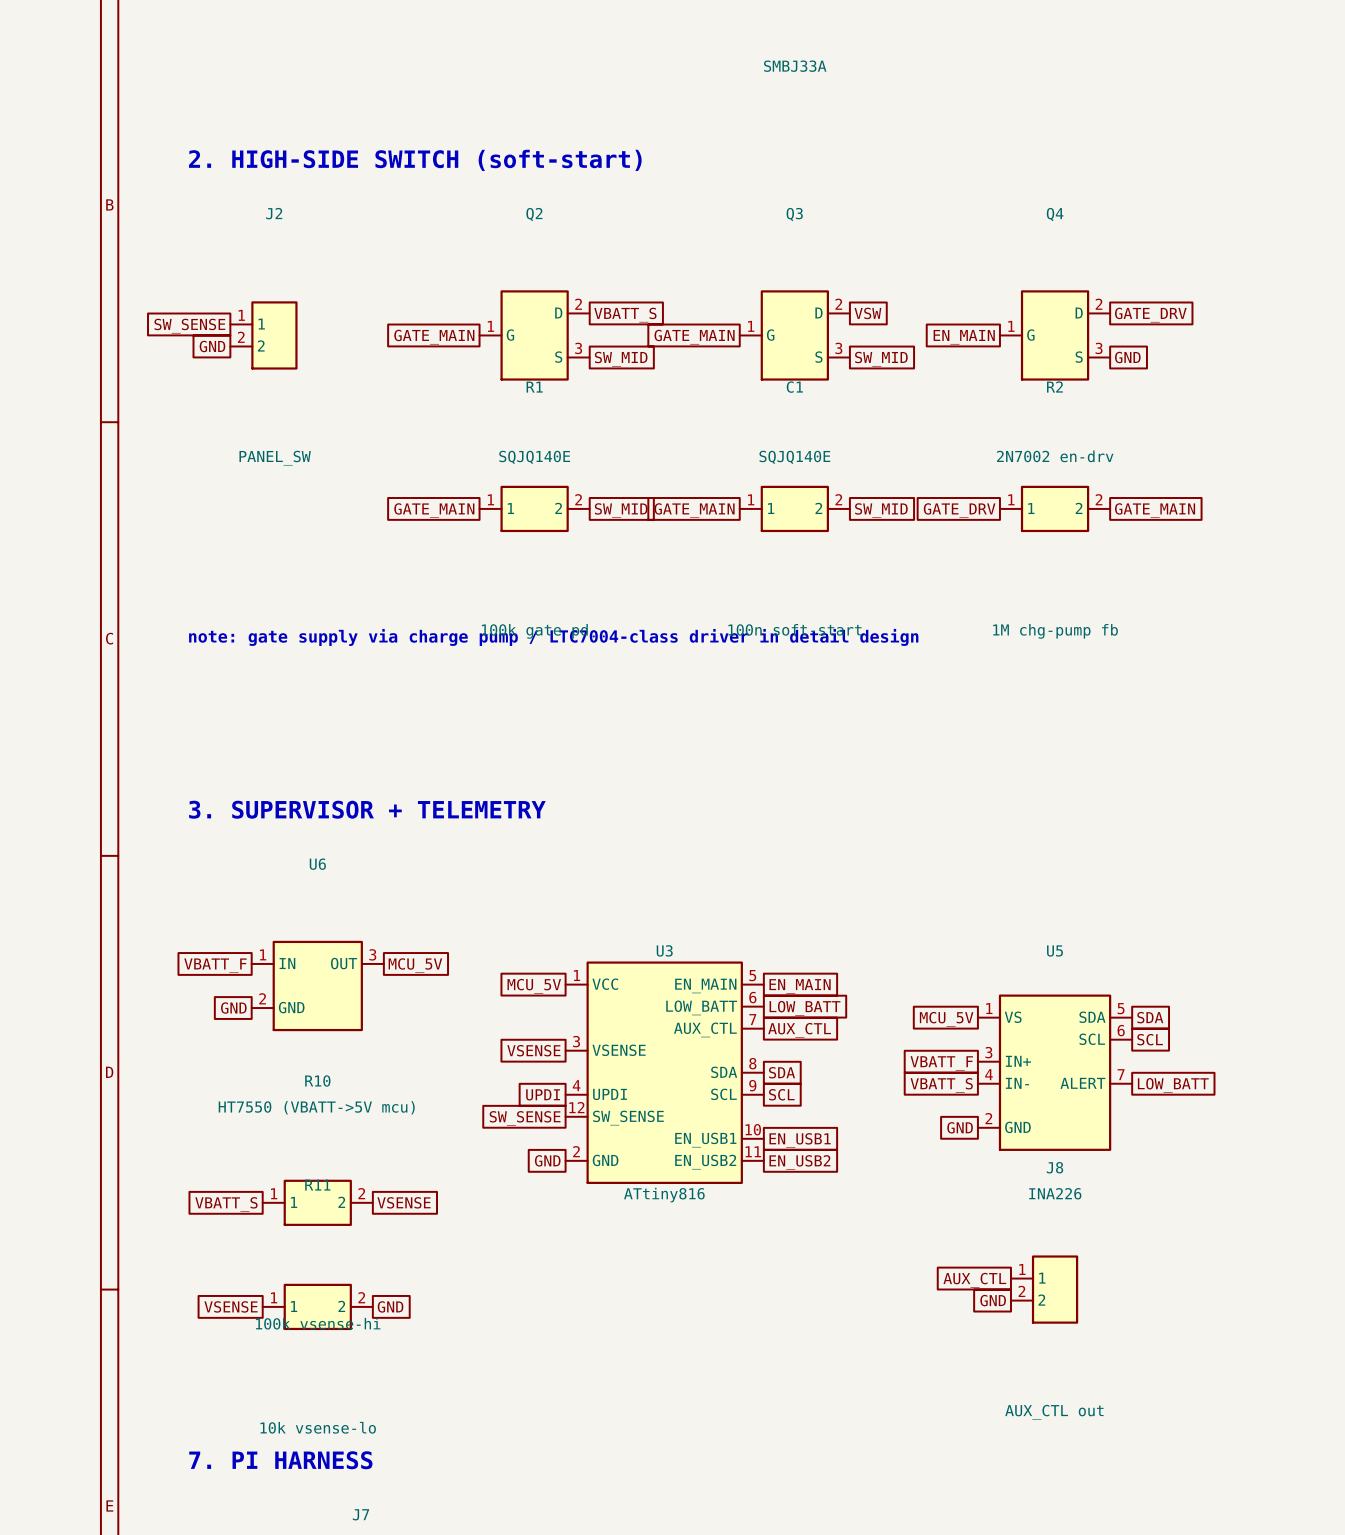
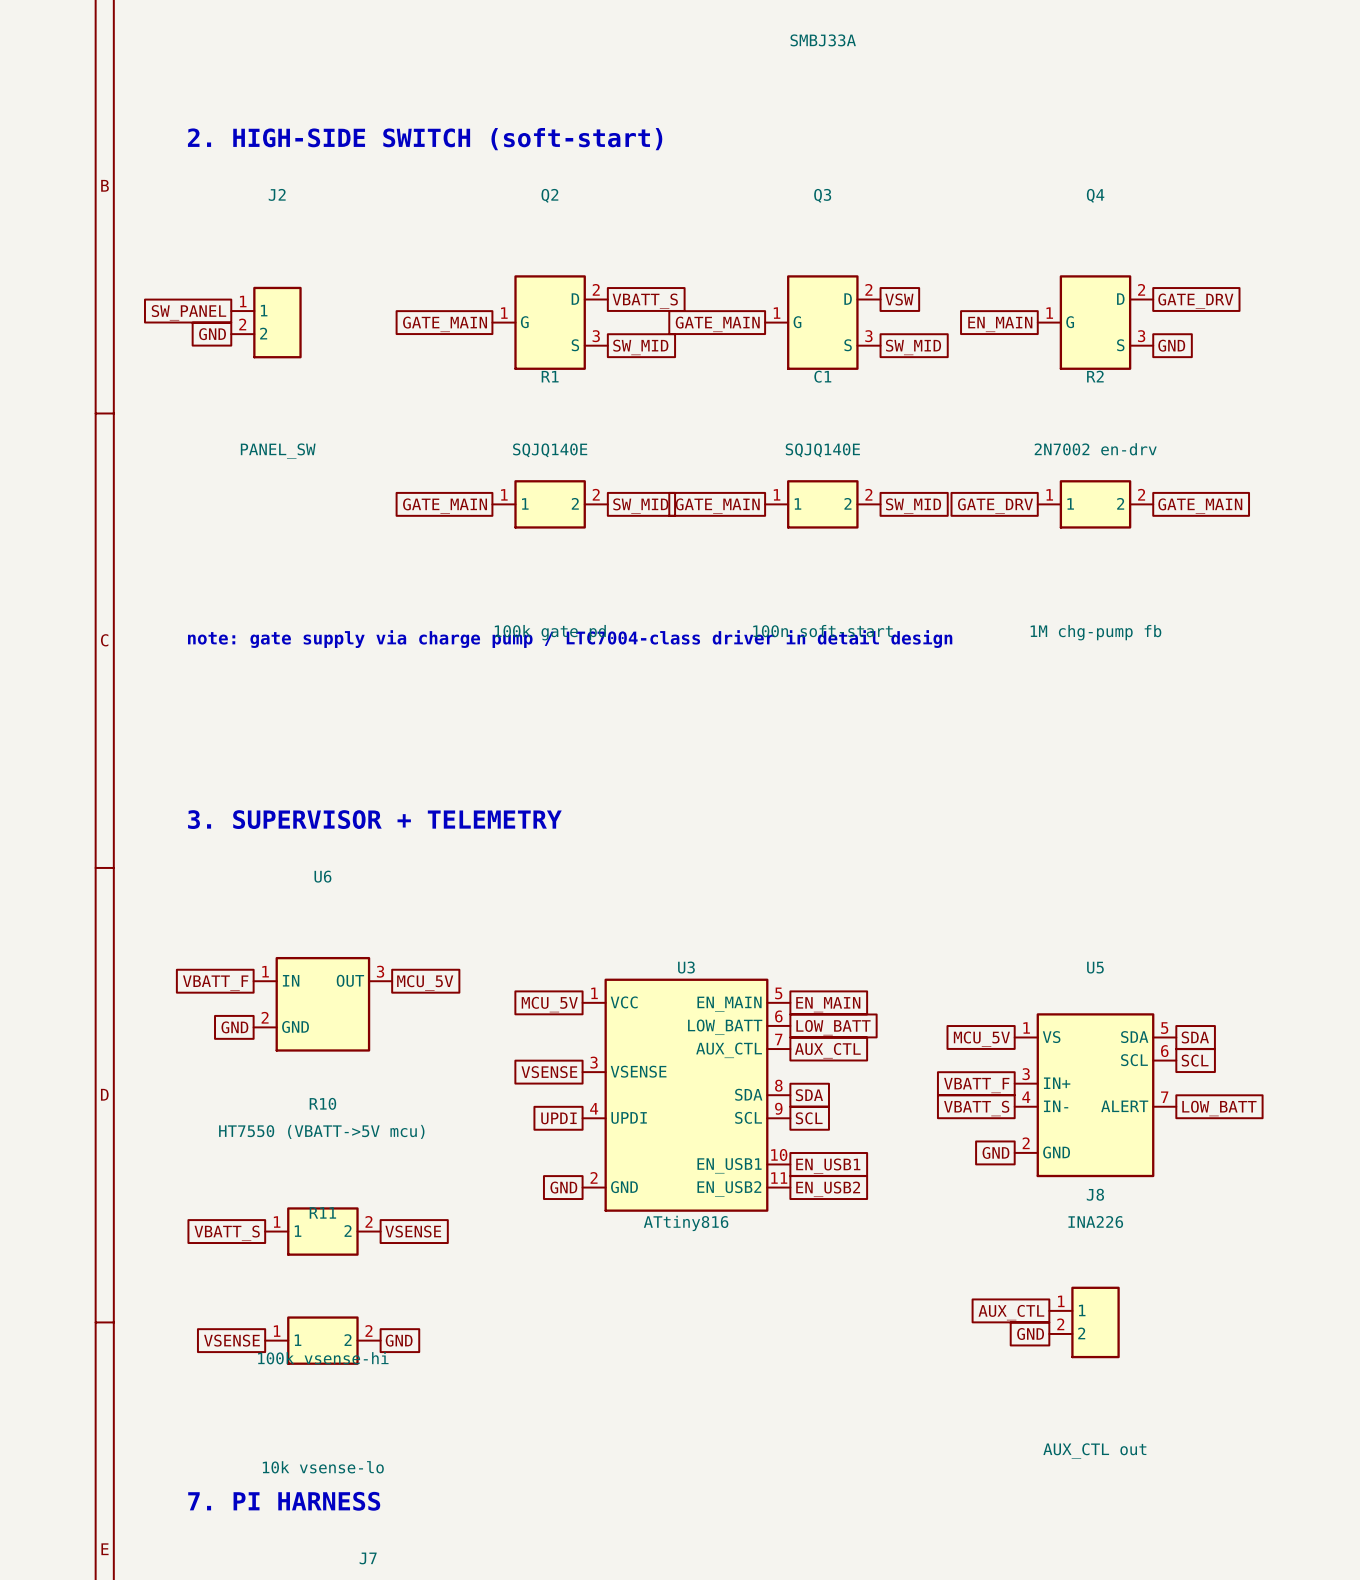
global label: SW_SENSE (189, 326) -> SW_PANEL (188, 312)
U3 symbol: [565, 961, 764, 1184] -> [582, 978, 791, 1212]
global label: SW_SENSE (525, 1118) -> none

